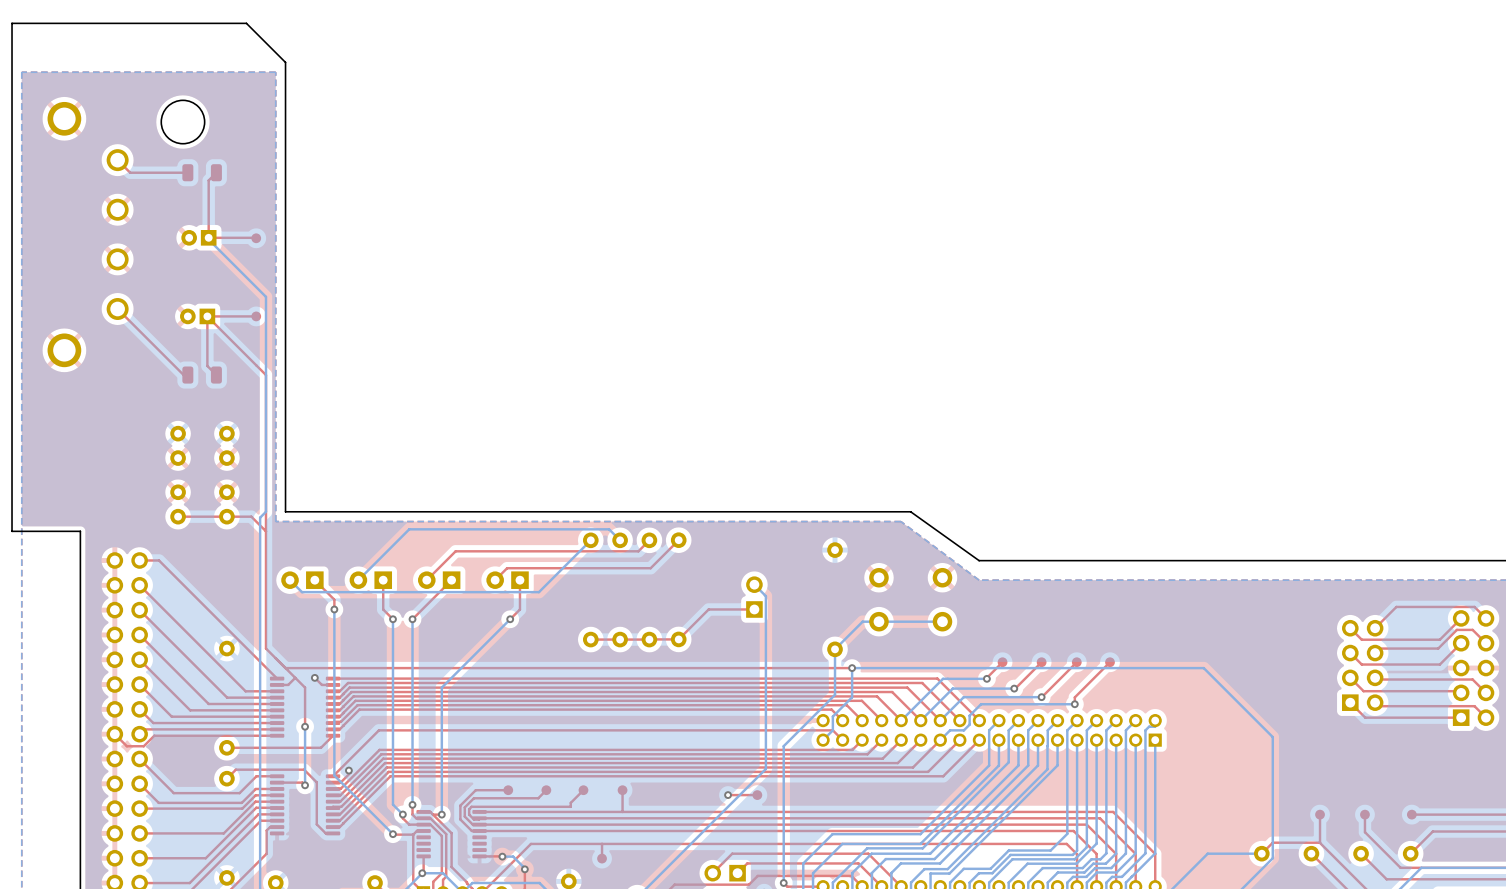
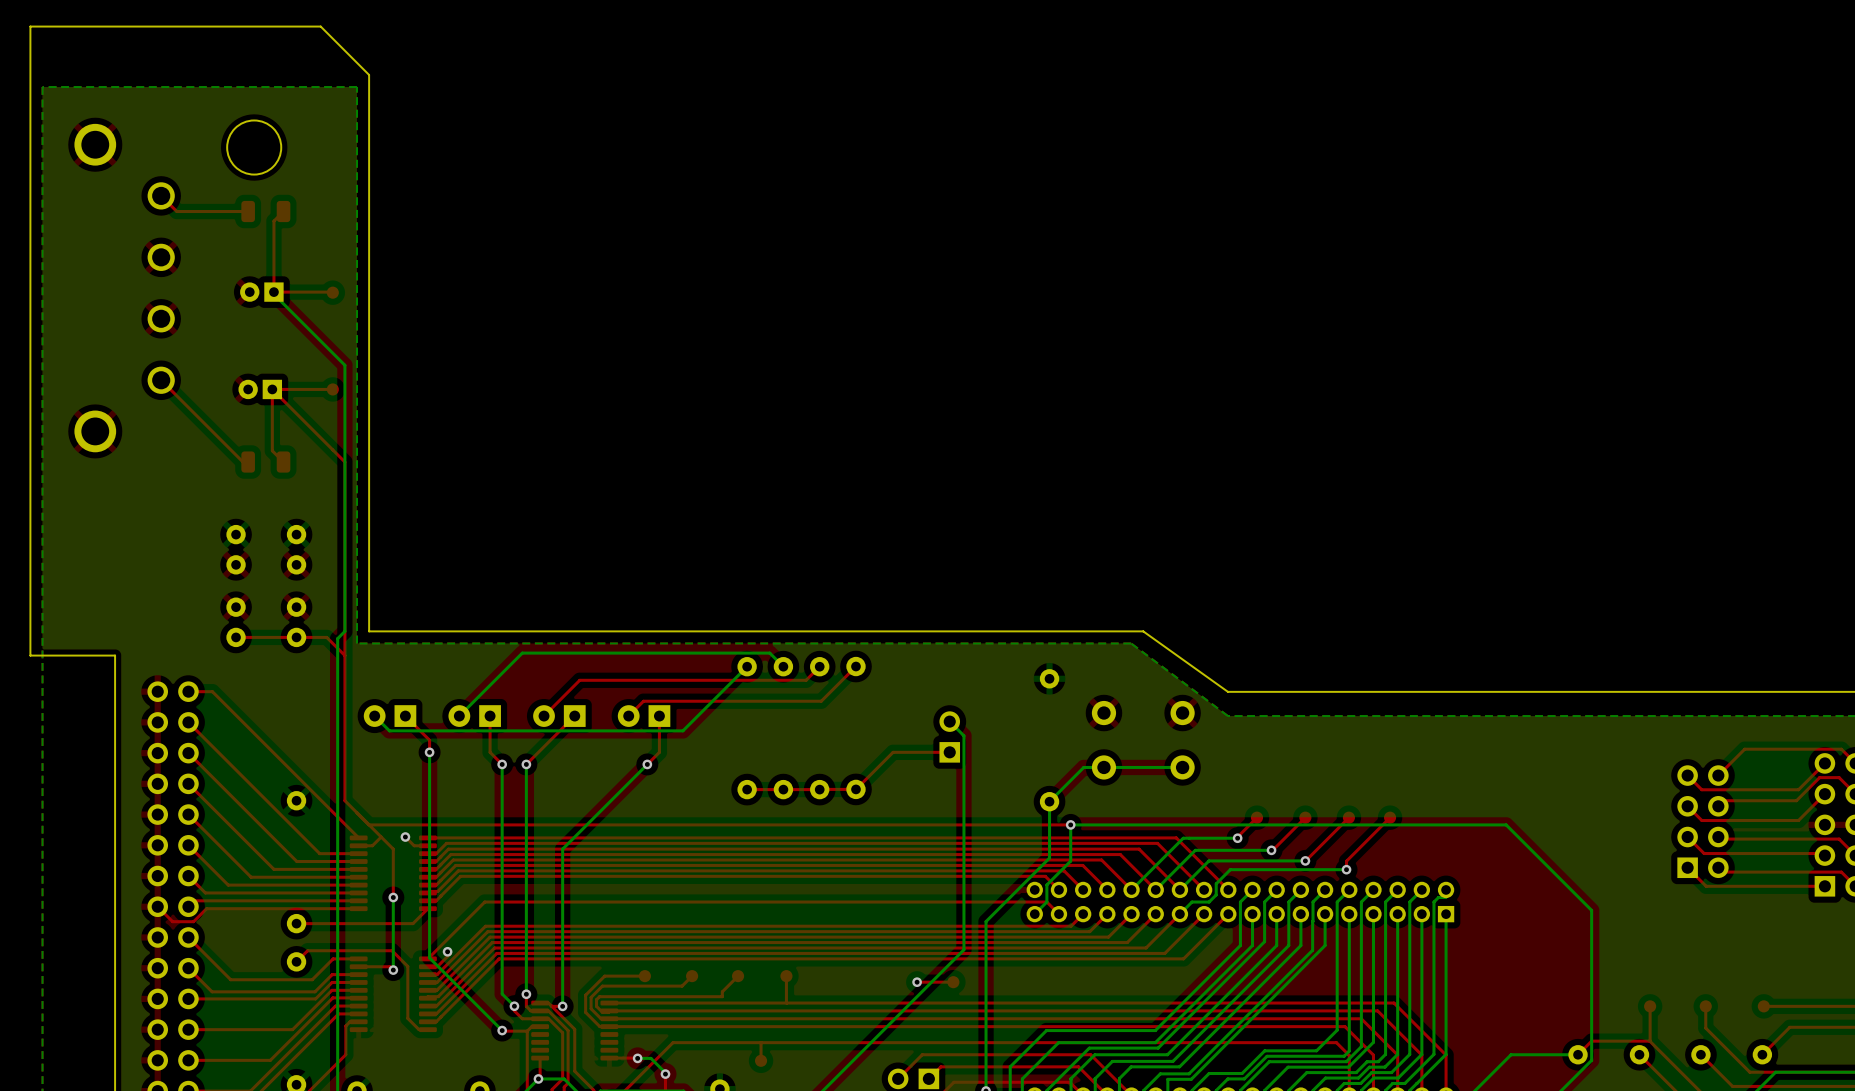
round board edge: none -> [226, 119, 282, 176]
round board edge: [160, 99, 206, 145] -> none

